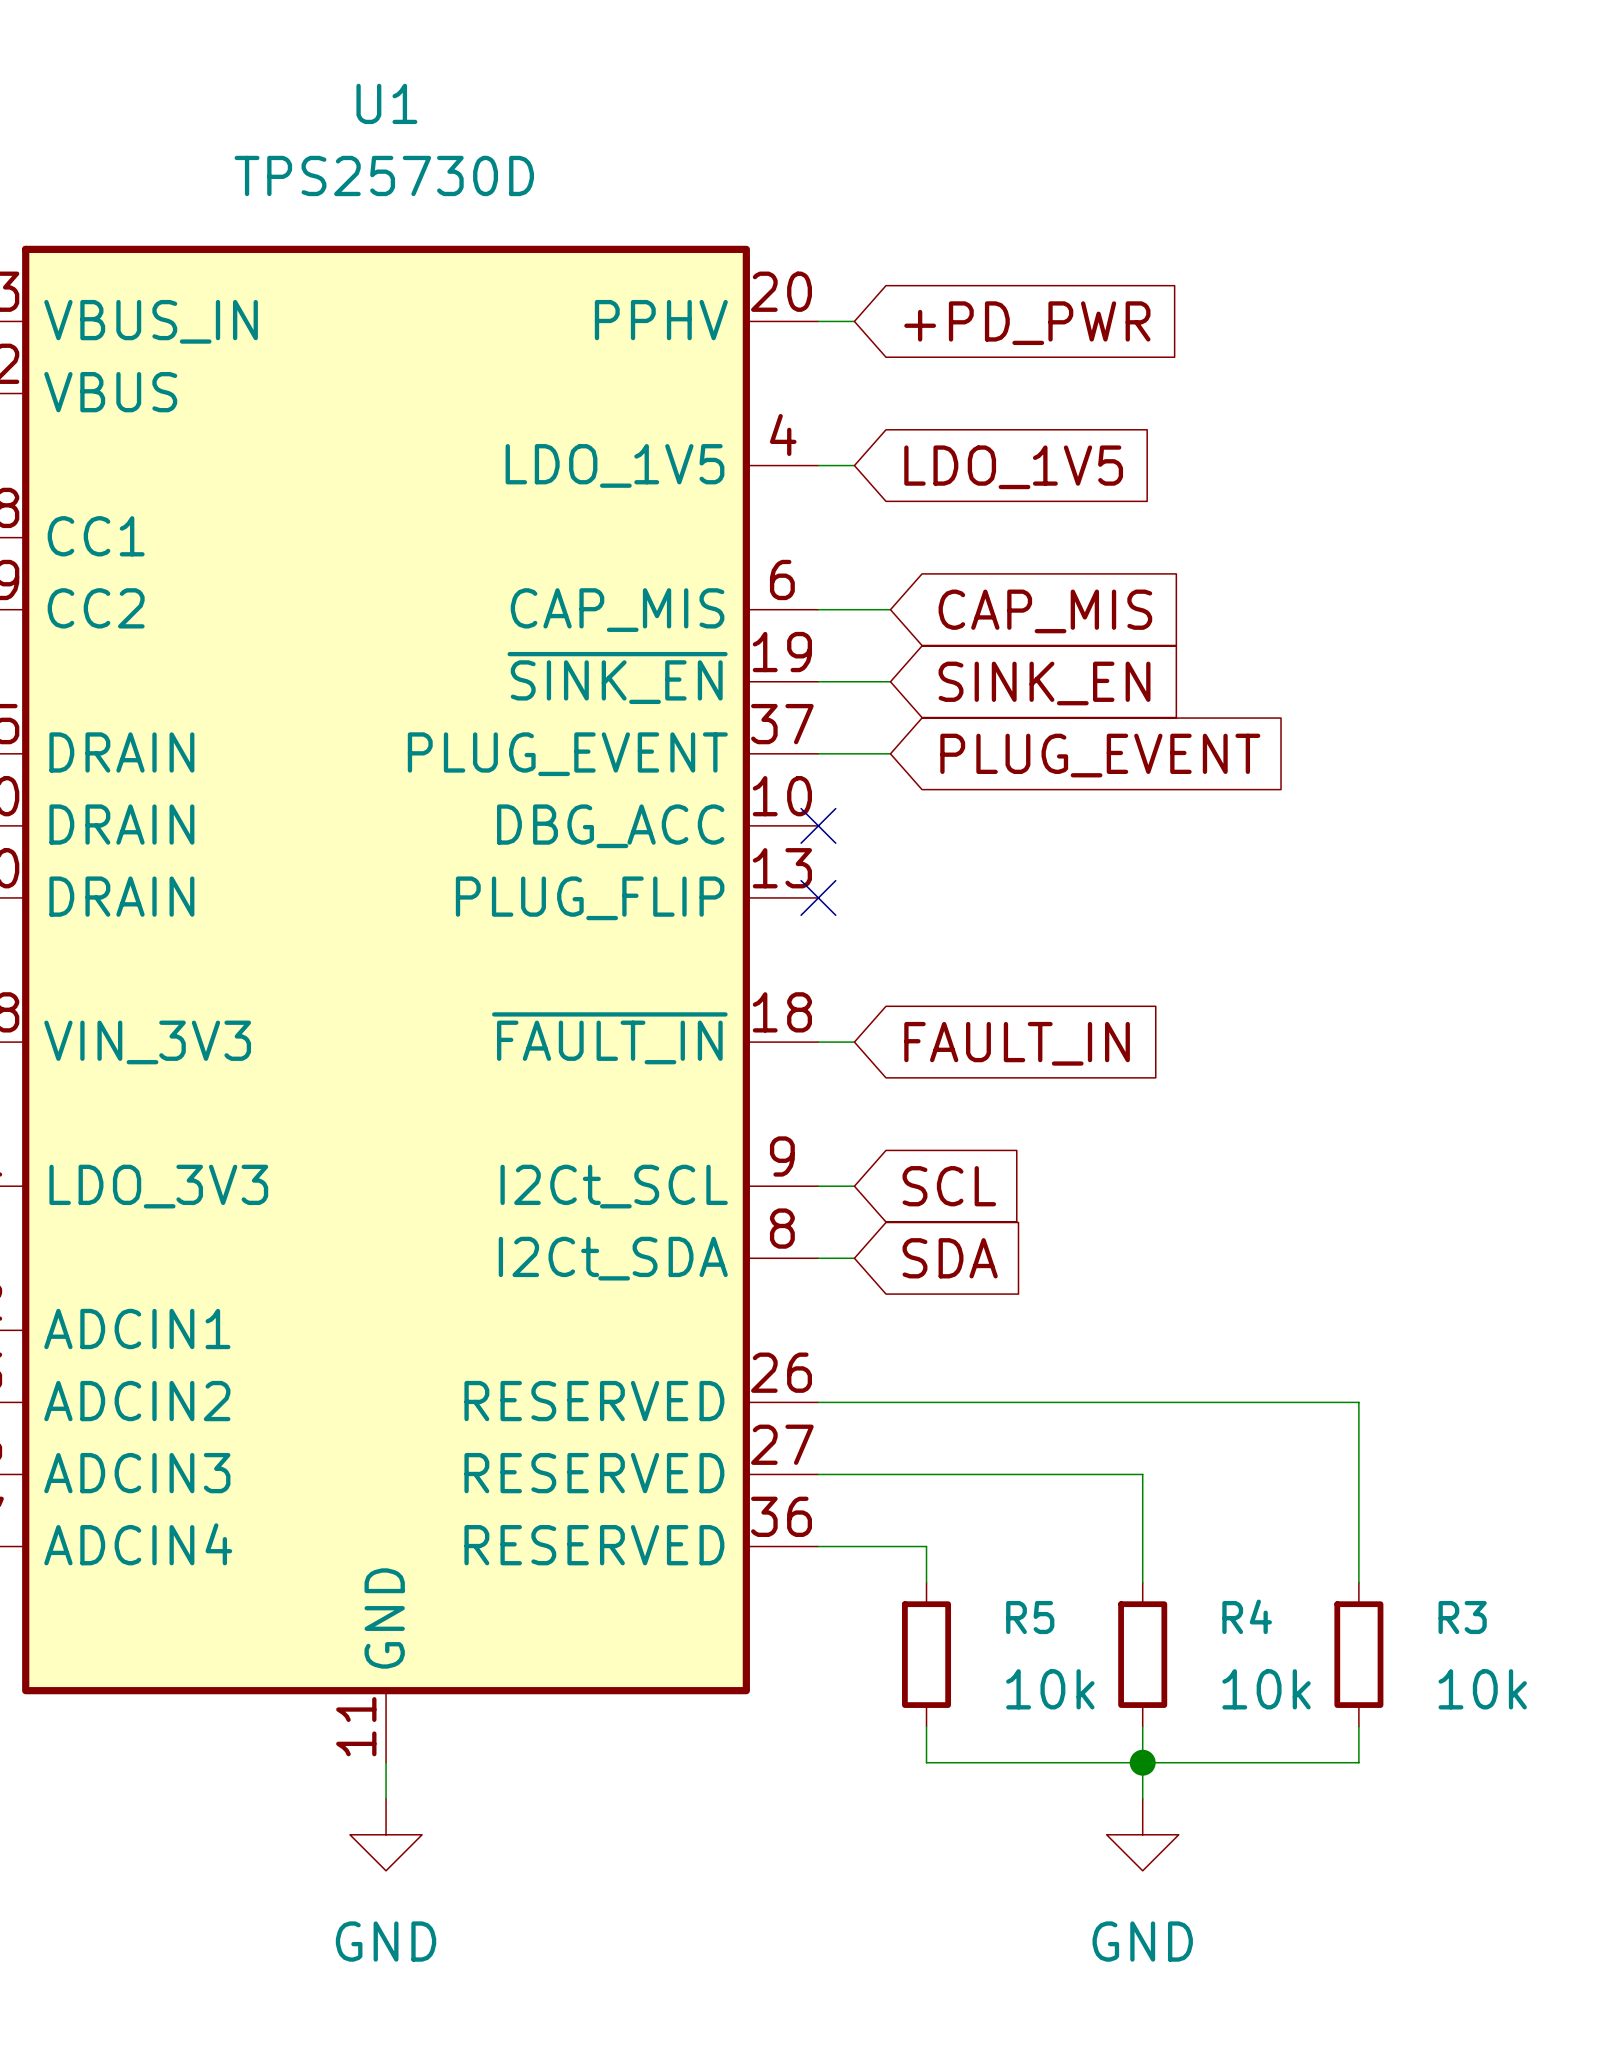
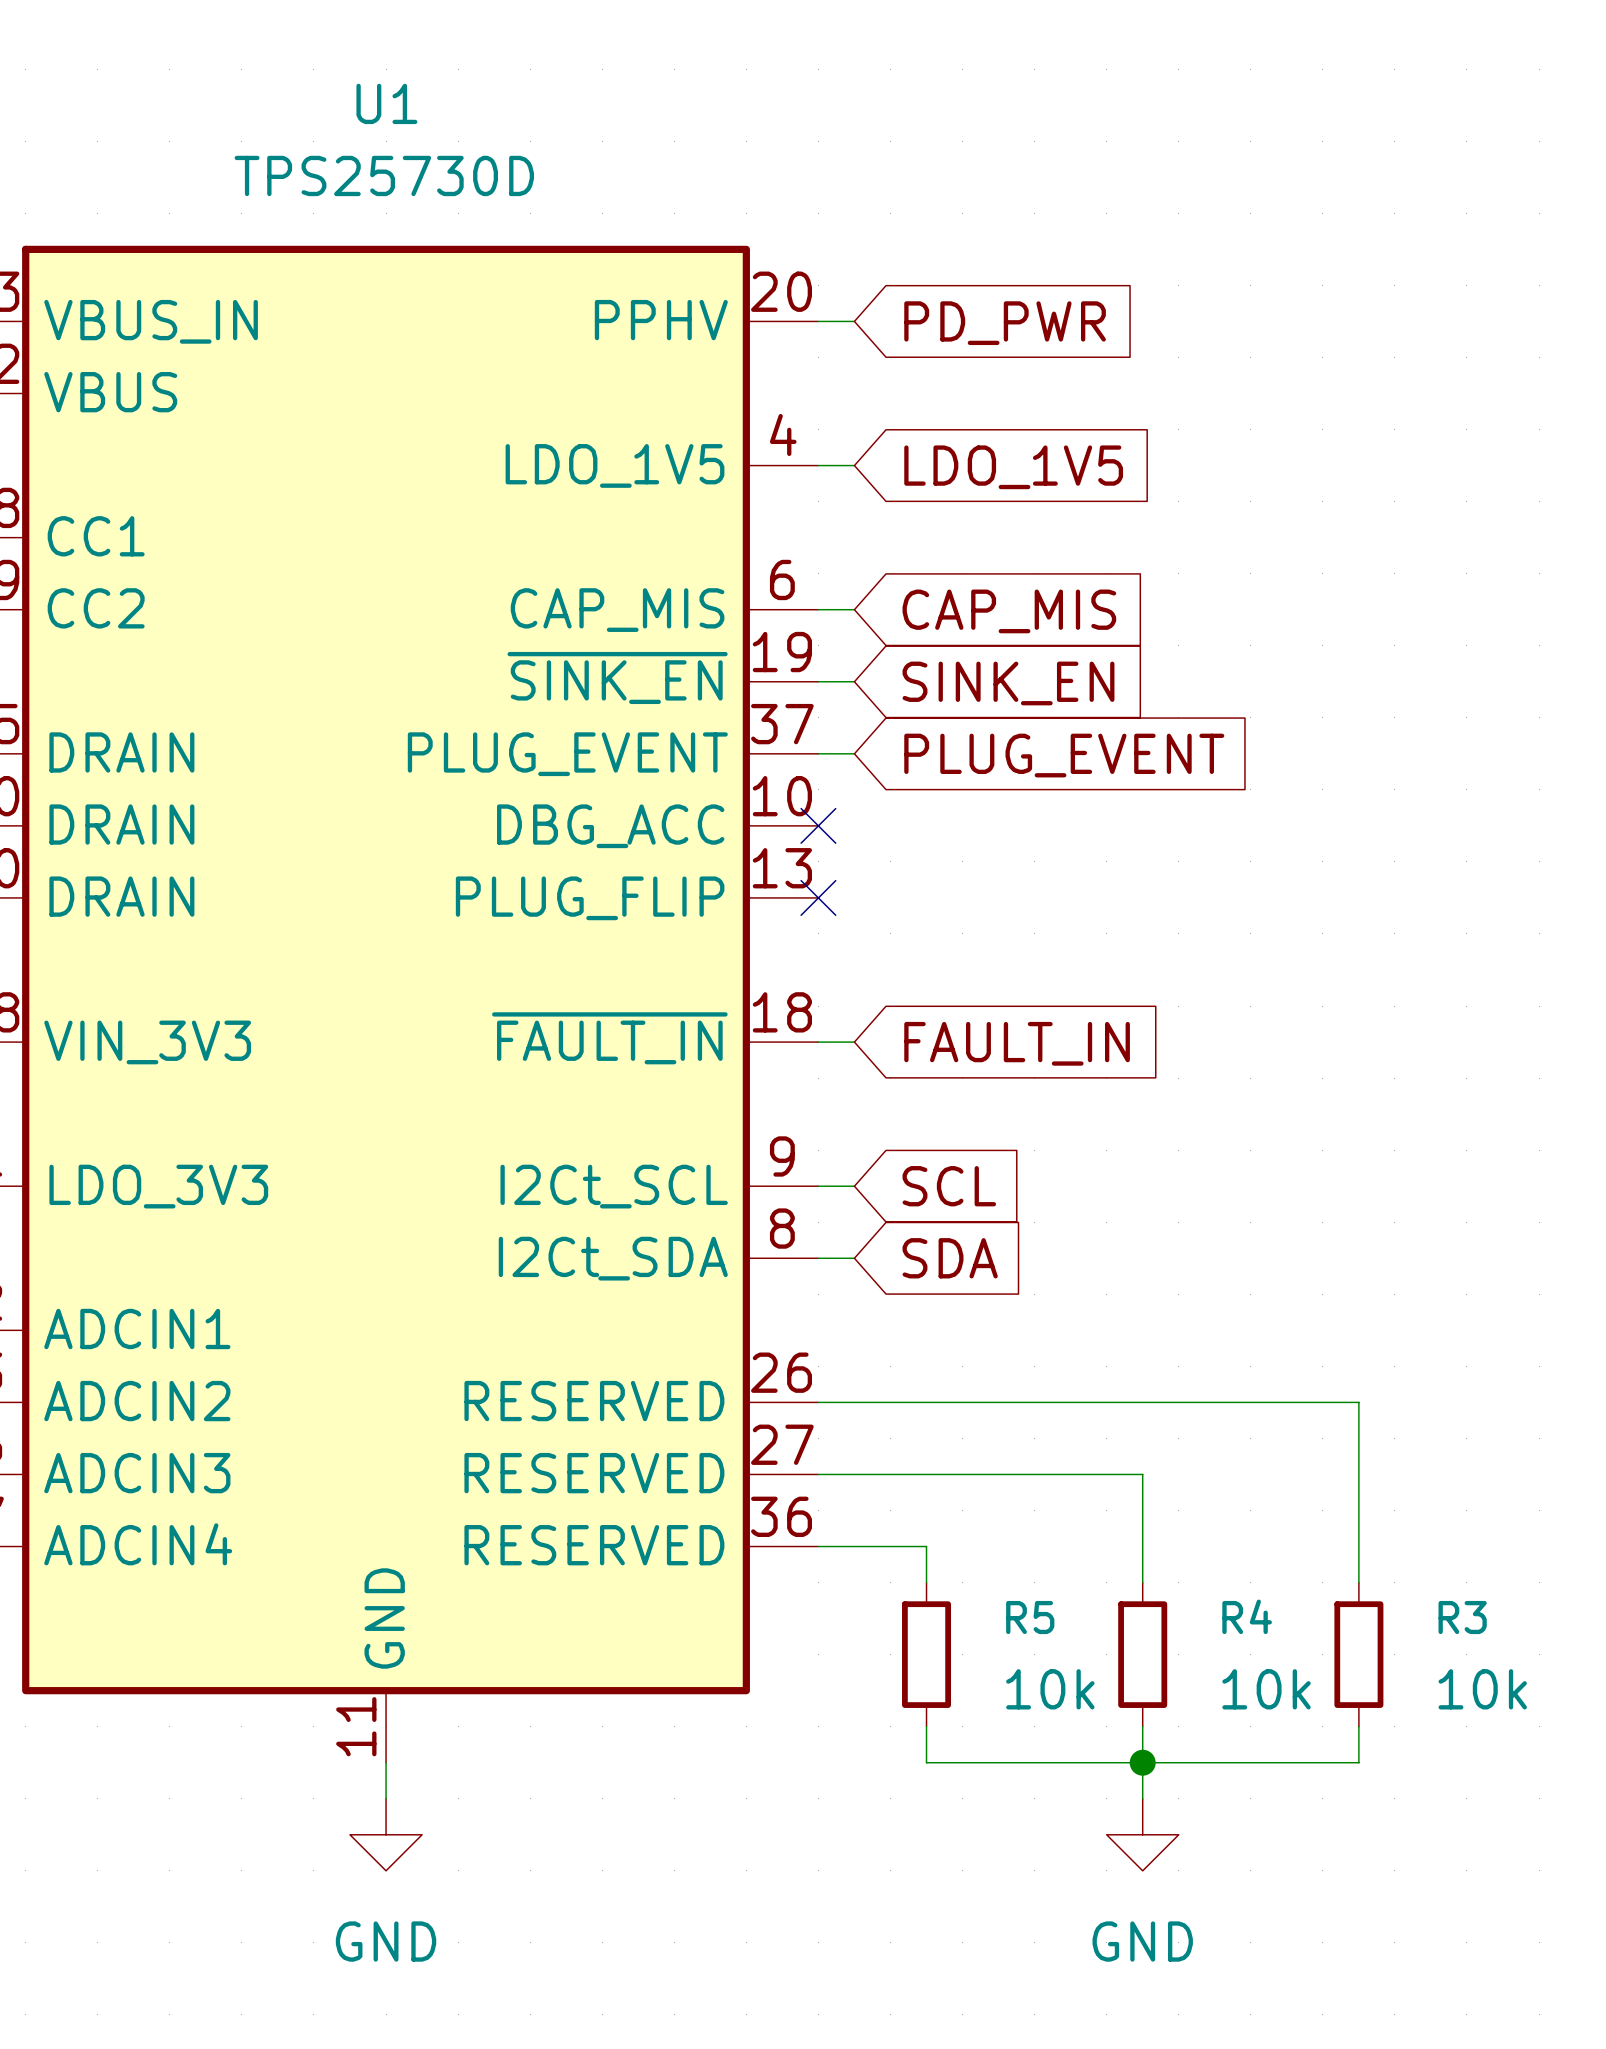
global label: +PD_PWR (1027, 323) -> PD_PWR (1005, 323)
wire: (854, 609) (890, 609) -> none
global label position: CAP_MIS (1045, 611) -> CAP_MIS (1009, 611)
wire: (854, 681) (890, 681) -> none
global label position: SINK_EN (1044, 683) -> SINK_EN (1008, 683)
wire: (854, 753) (890, 753) -> none
global label position: PLUG_EVENT (1100, 755) -> PLUG_EVENT (1064, 755)

